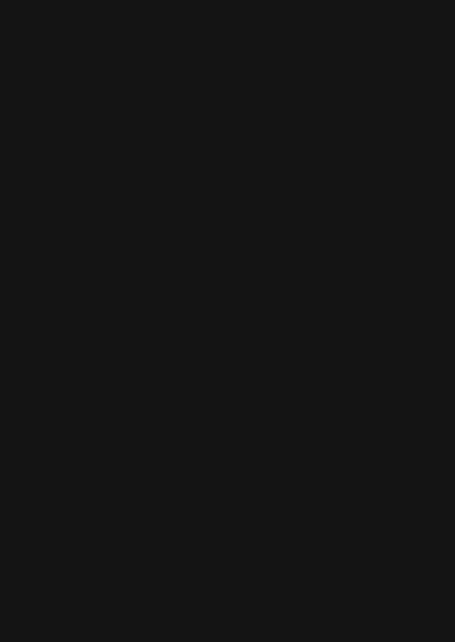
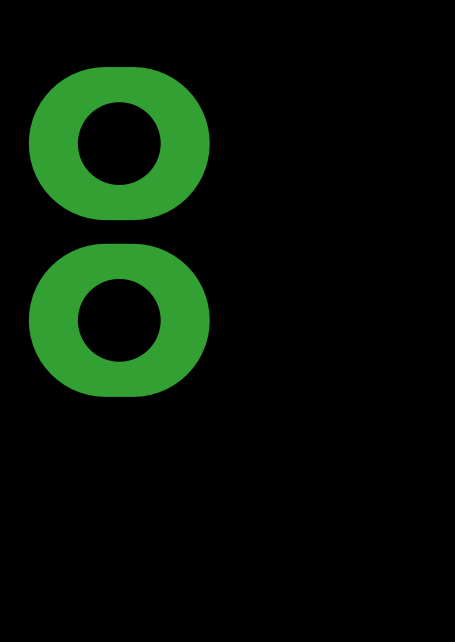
part: none -> (119, 231)

